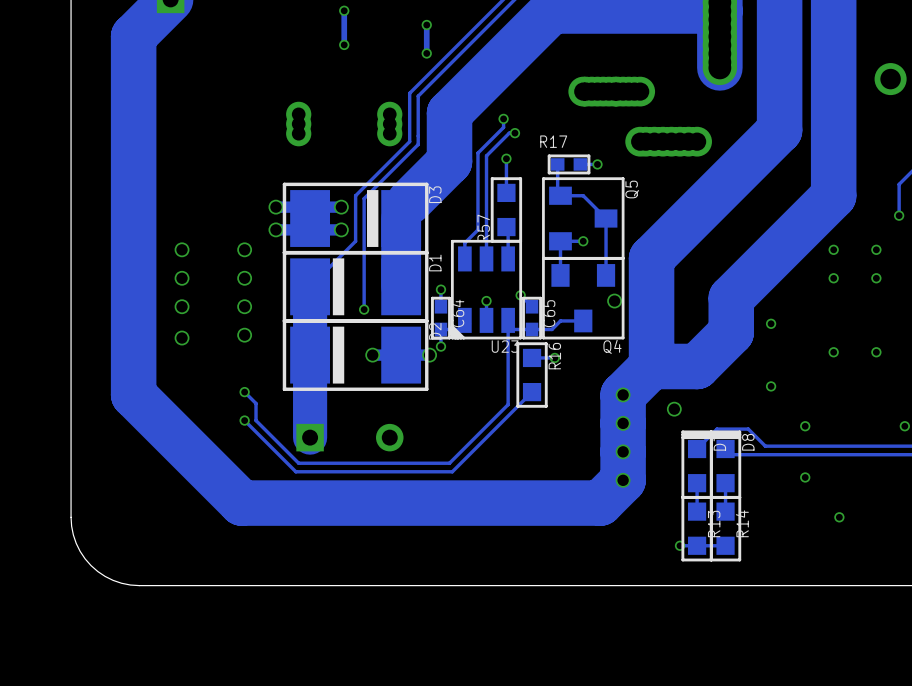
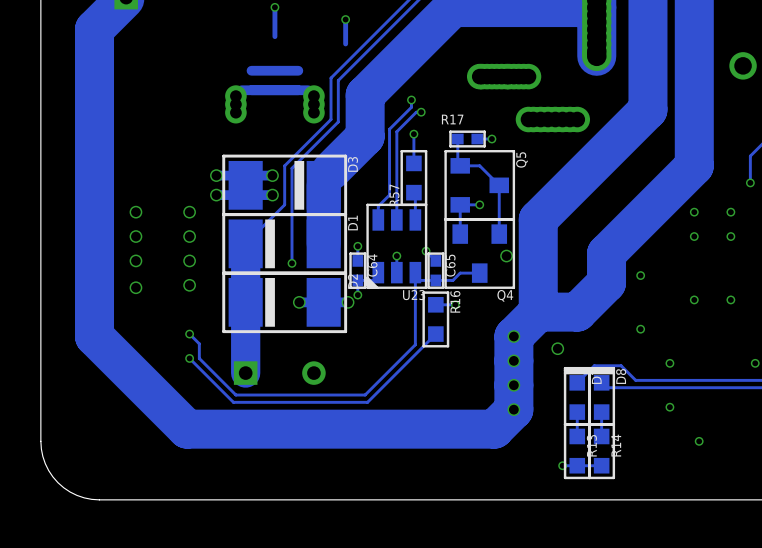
via: (344, 44) -> none
via: (426, 53) -> none
track: none -> (298, 70) (251, 70)
track: none -> (308, 90) (241, 90)

